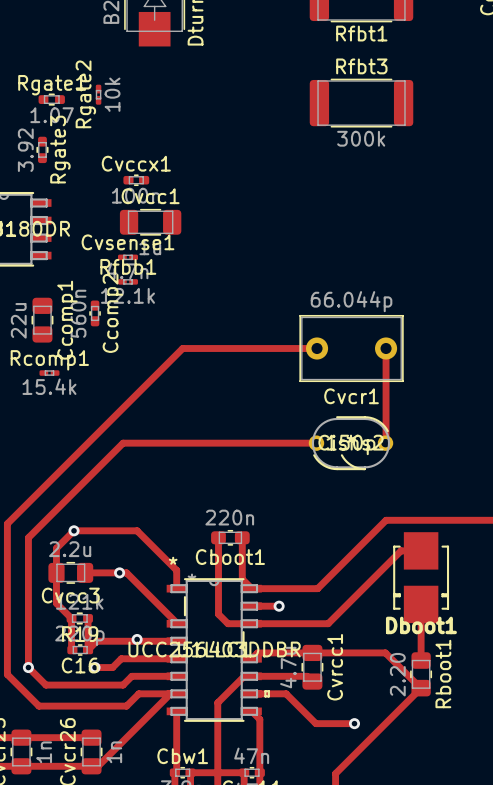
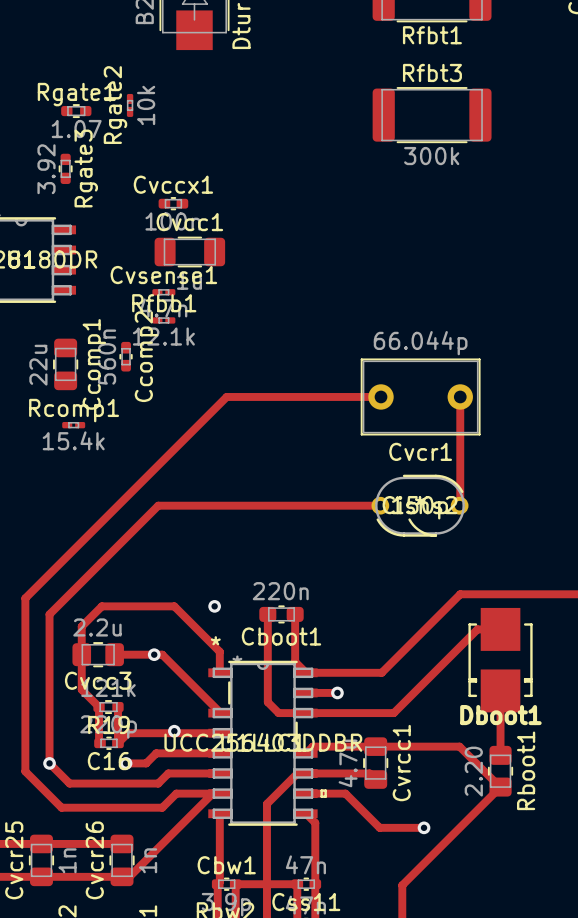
via: (74, 530) -> none
via: none -> (214, 606)

